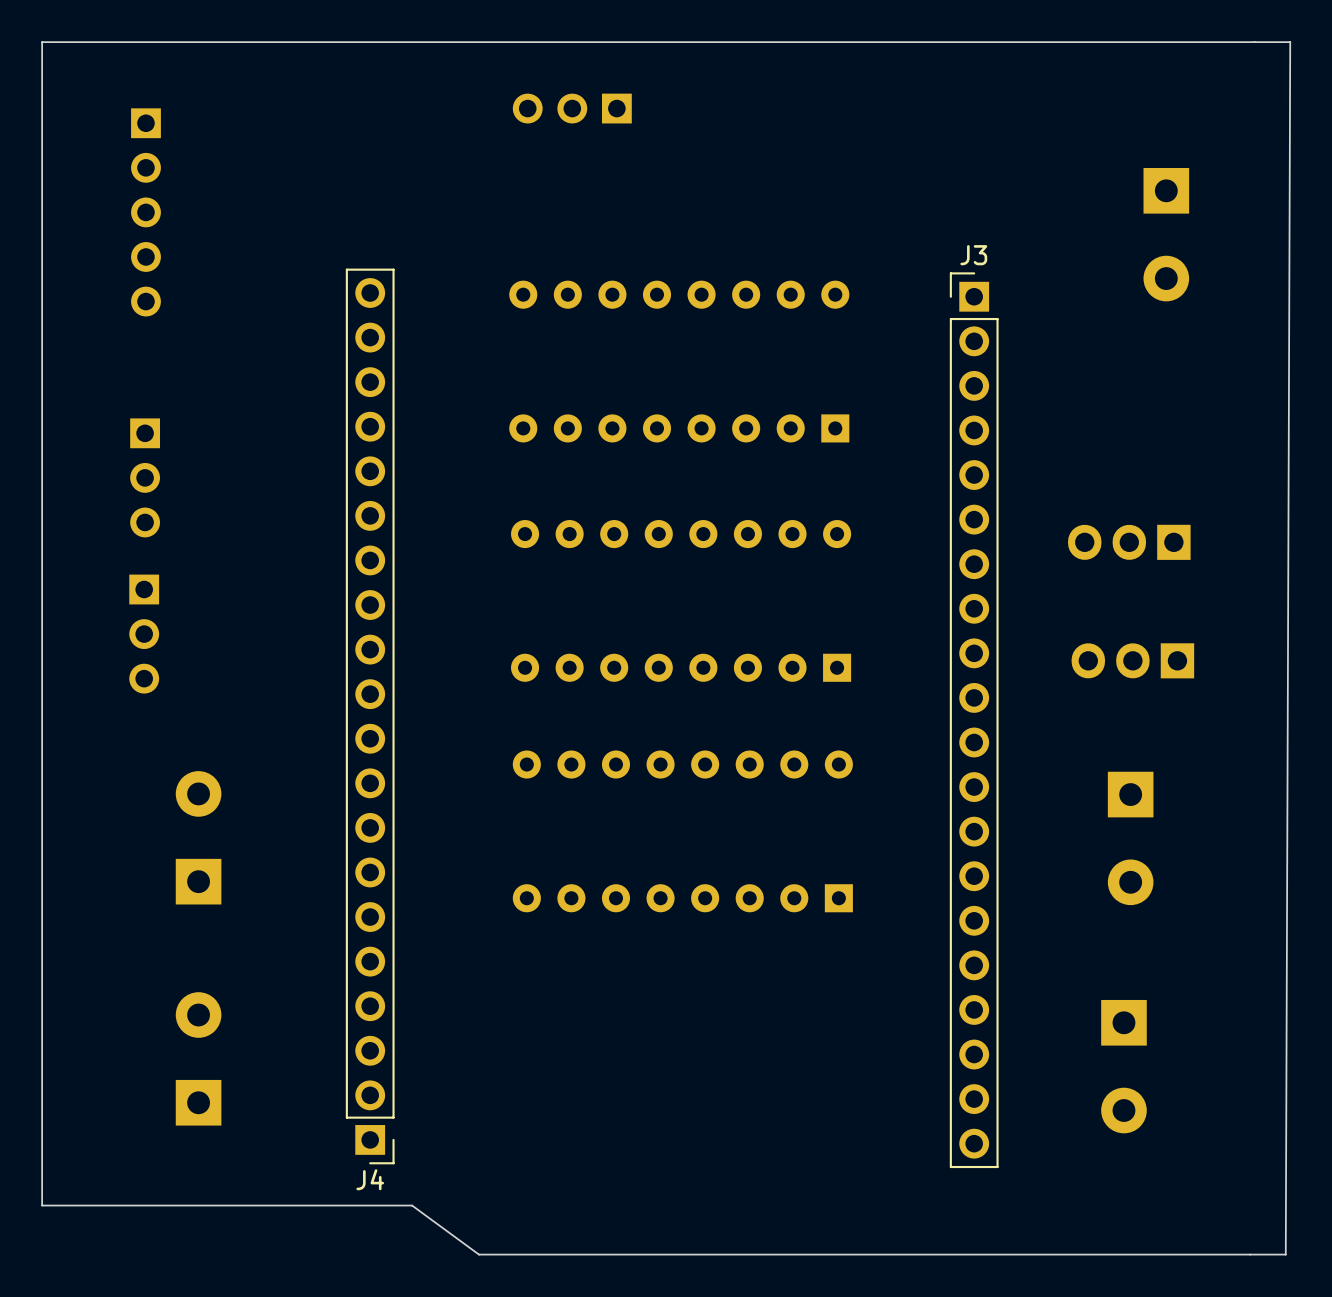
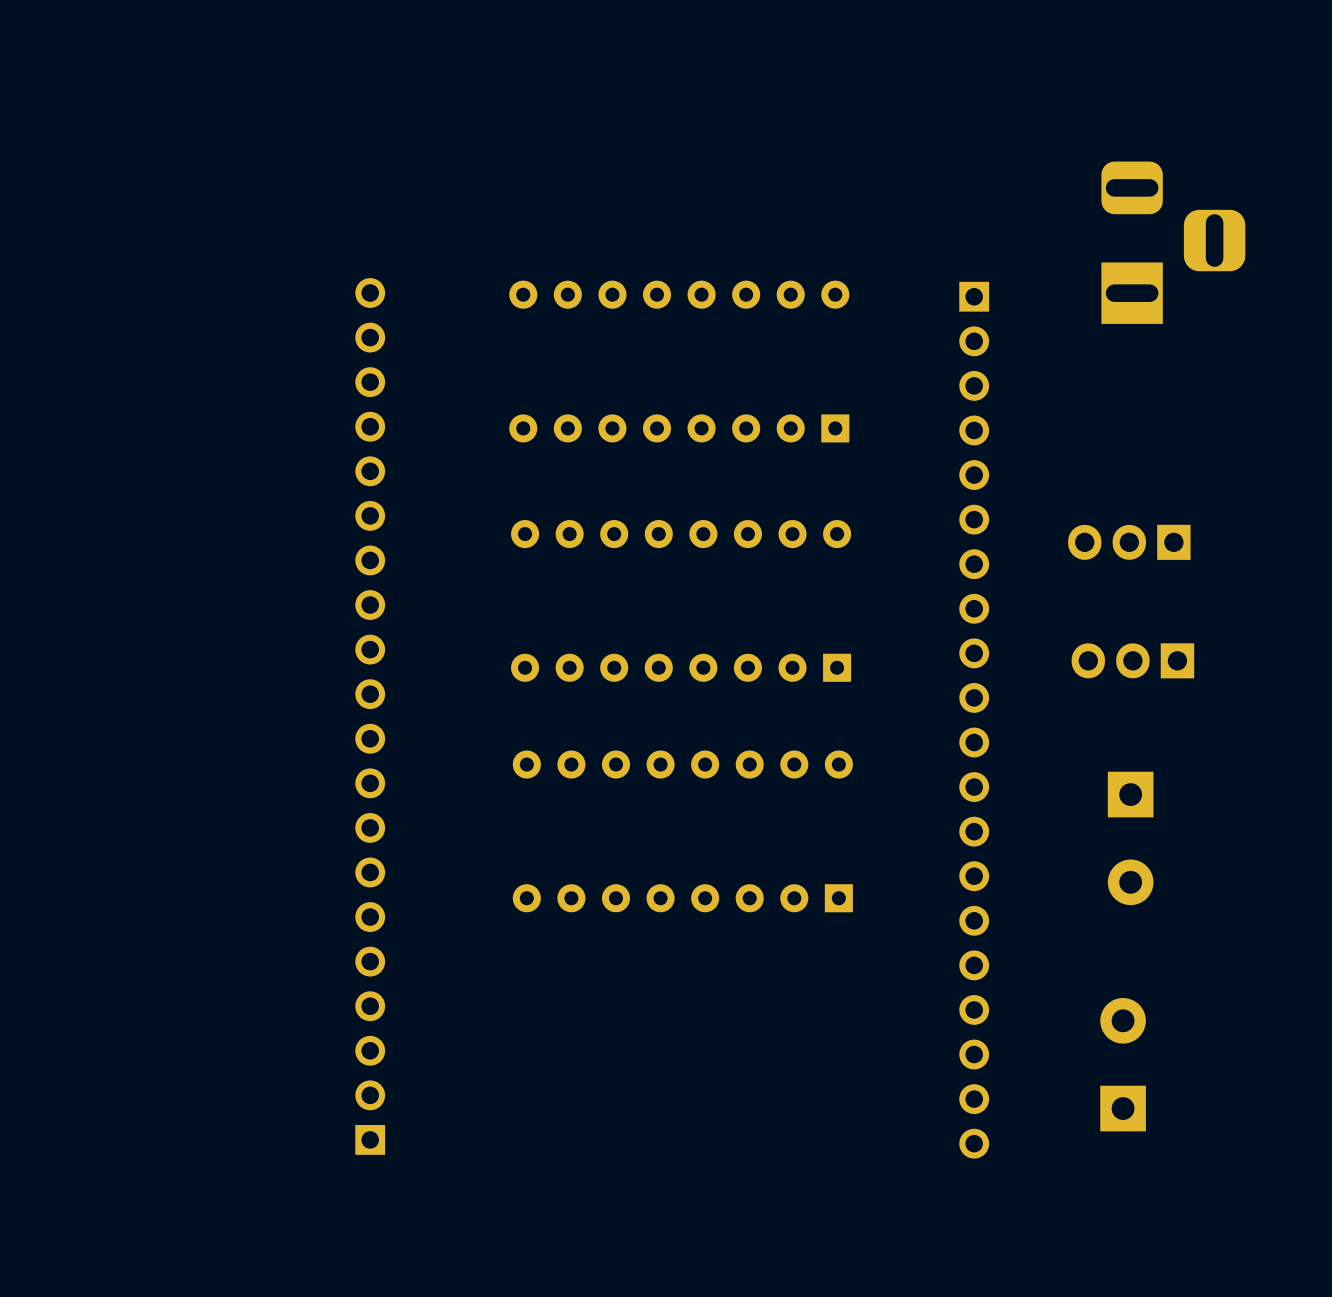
board edge: (1290, 42) (1285, 1254) (478, 1254) (412, 1205) (42, 1205) (42, 42) (1290, 42) -> none
part: (572, 108) -> none
part footprint: [1143, 168, 1190, 302] -> [1101, 161, 1246, 324]
part: (145, 212) -> none
part: (145, 477) -> none
part: (144, 634) -> none
J4 side: bottom (370, 716) -> top (370, 716)
J3 side: bottom (974, 720) -> top (974, 720)
part: (198, 837) -> none
part: (198, 1058) -> none
part rotation: 0° (1123, 1066) -> 180° (1123, 1064)

